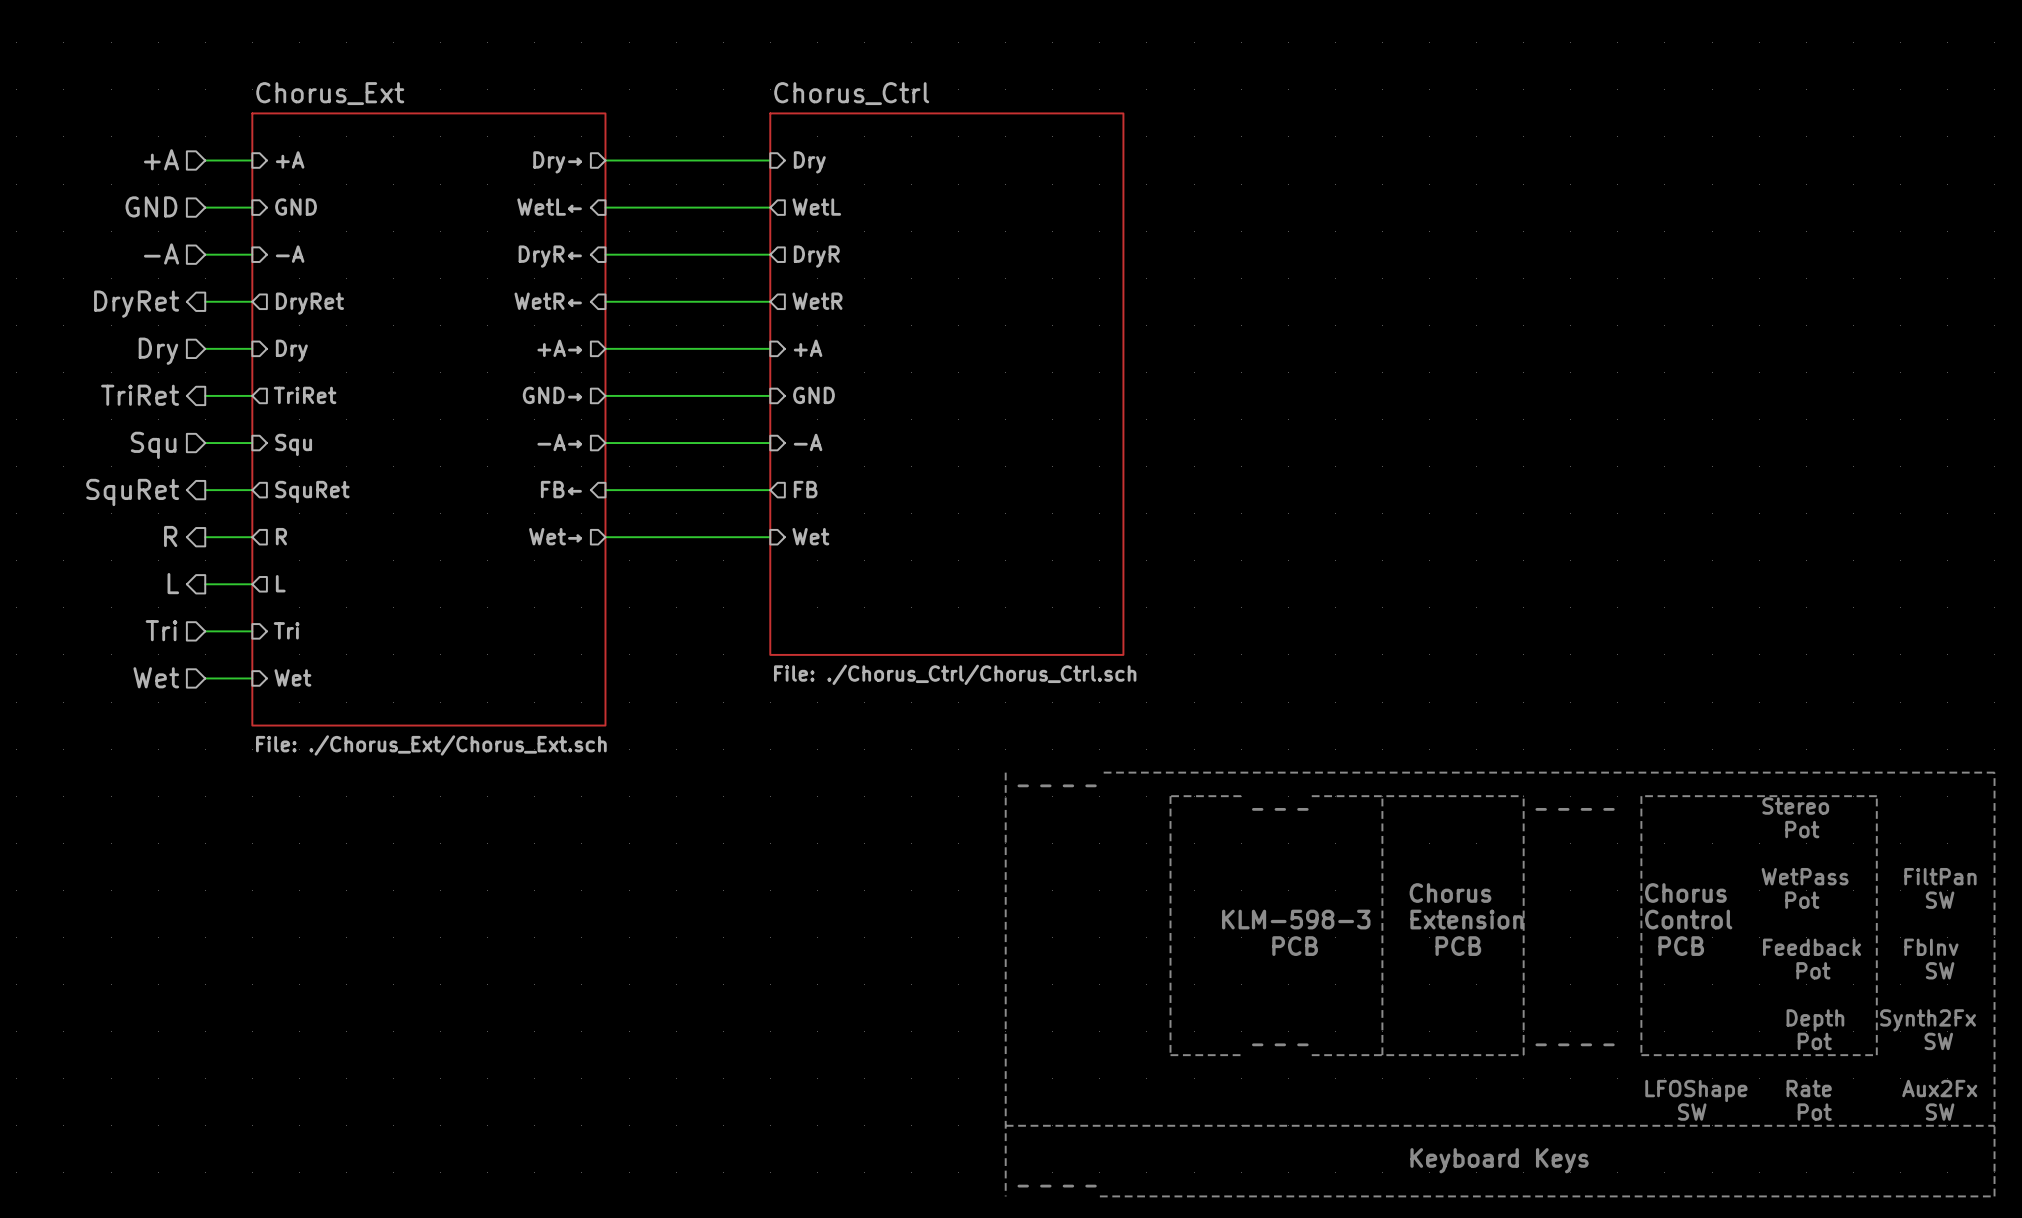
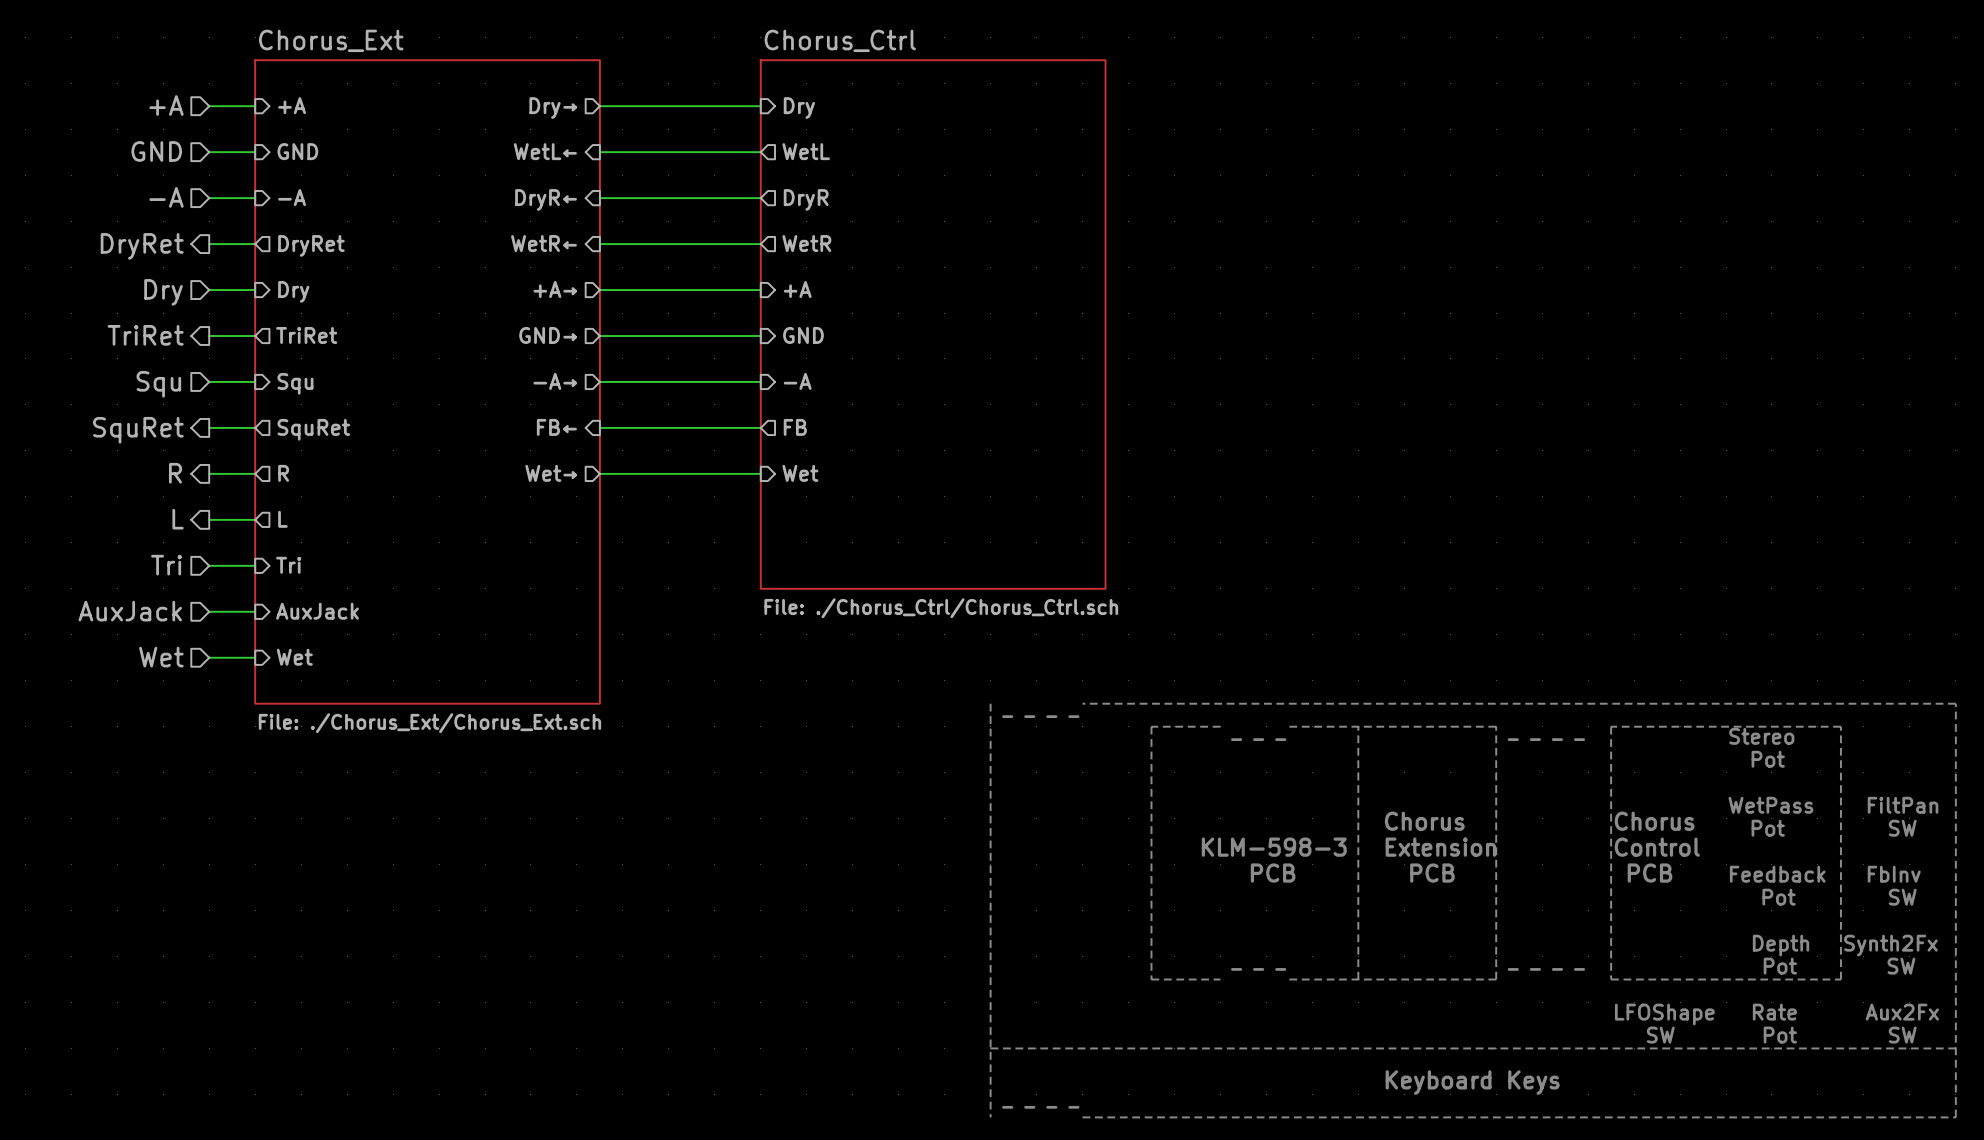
sheet Chorus_Ext: File: ./Chorus_Ext/Chorus_Ext.sch (428, 419) -> none
sheet Chorus_Ext: none -> File: ./Chorus_Ext/Chorus_Ext.sch (427, 381)
hierarchical label: Wet (156, 677) -> AuxJack (130, 611)
sheet pin: Wet (292, 677) -> AuxJack (317, 611)
hierarchical label: none -> Wet (161, 657)
wire: none -> (209, 657) (255, 657)
sheet pin: none -> Wet (294, 657)

